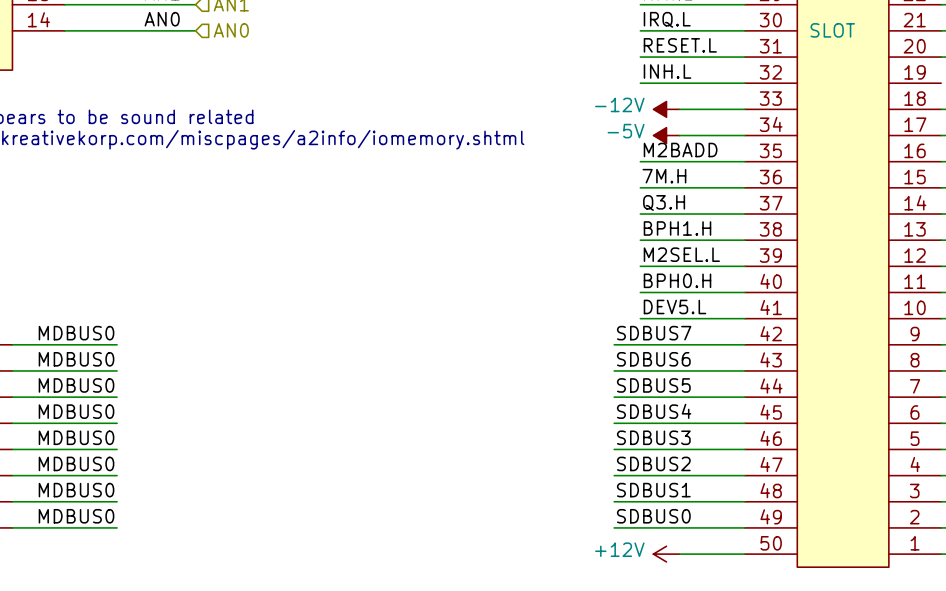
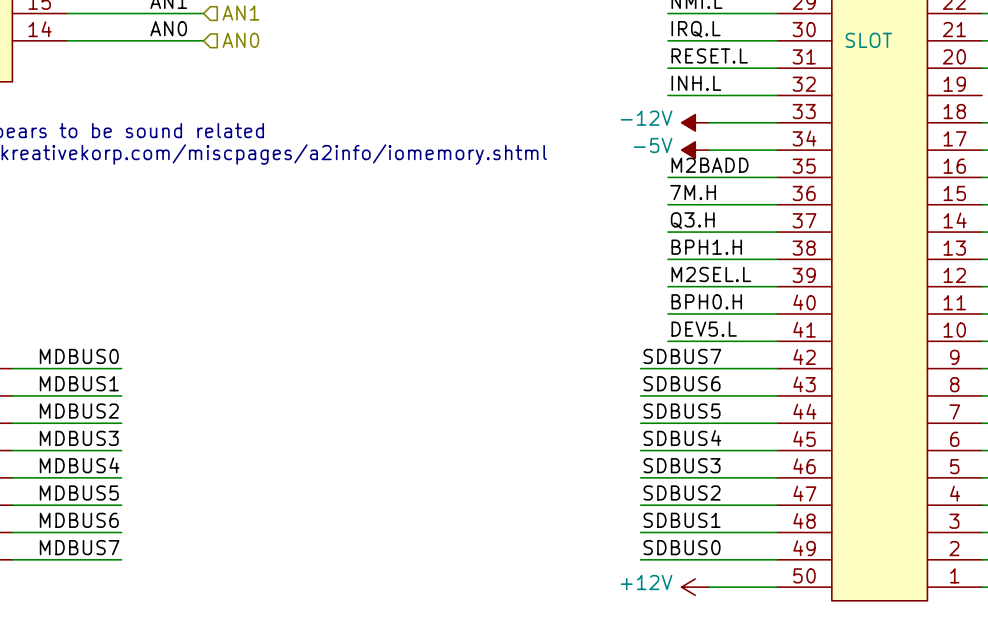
label: MDBUS0 (76, 359) -> MDBUS1 (79, 383)
label: MDBUS0 (76, 385) -> MDBUS2 (79, 411)
label: MDBUS0 (76, 411) -> MDBUS3 (79, 438)
label: MDBUS0 (76, 437) -> MDBUS4 (79, 465)
label: MDBUS0 (76, 463) -> MDBUS5 (79, 493)
label: MDBUS0 (76, 490) -> MDBUS6 (79, 520)
label: MDBUS0 (76, 516) -> MDBUS7 (79, 547)

